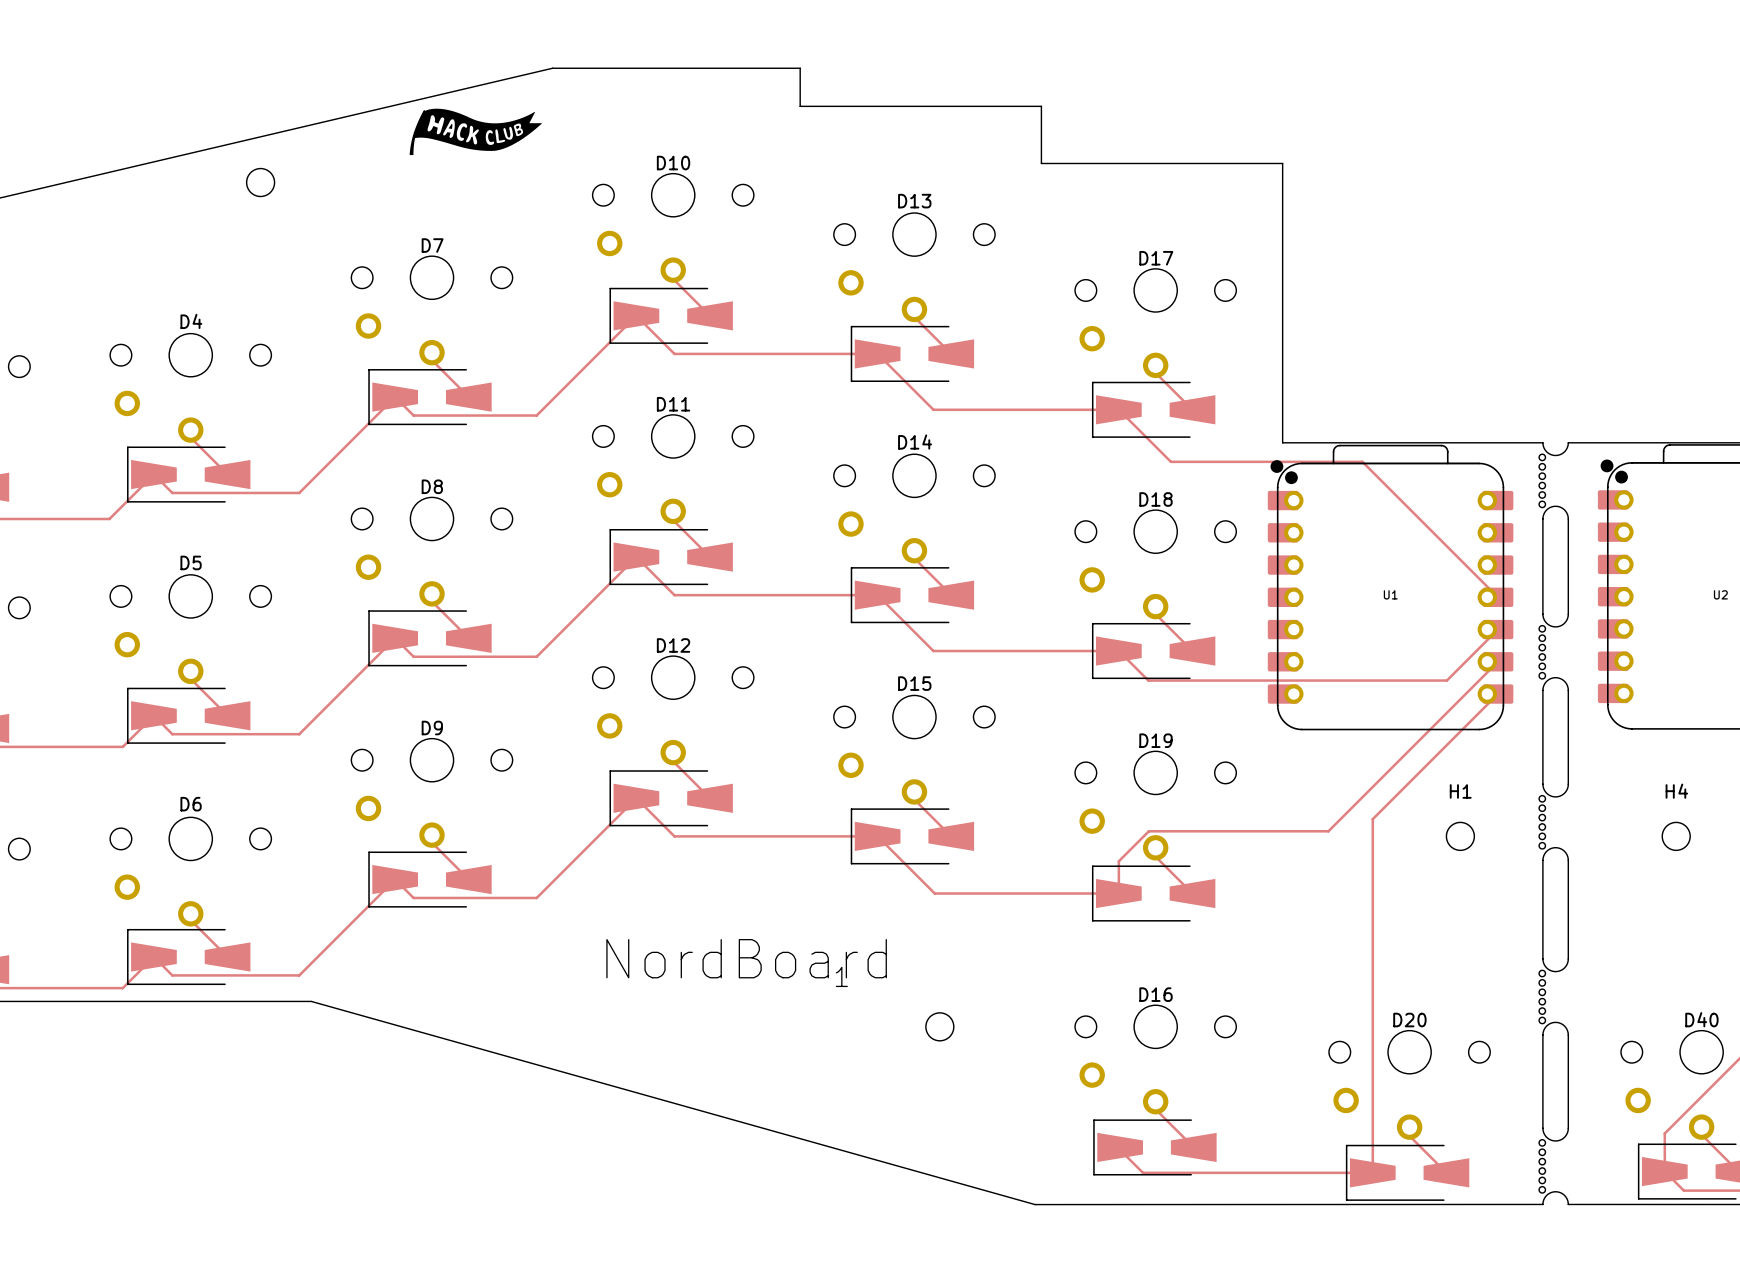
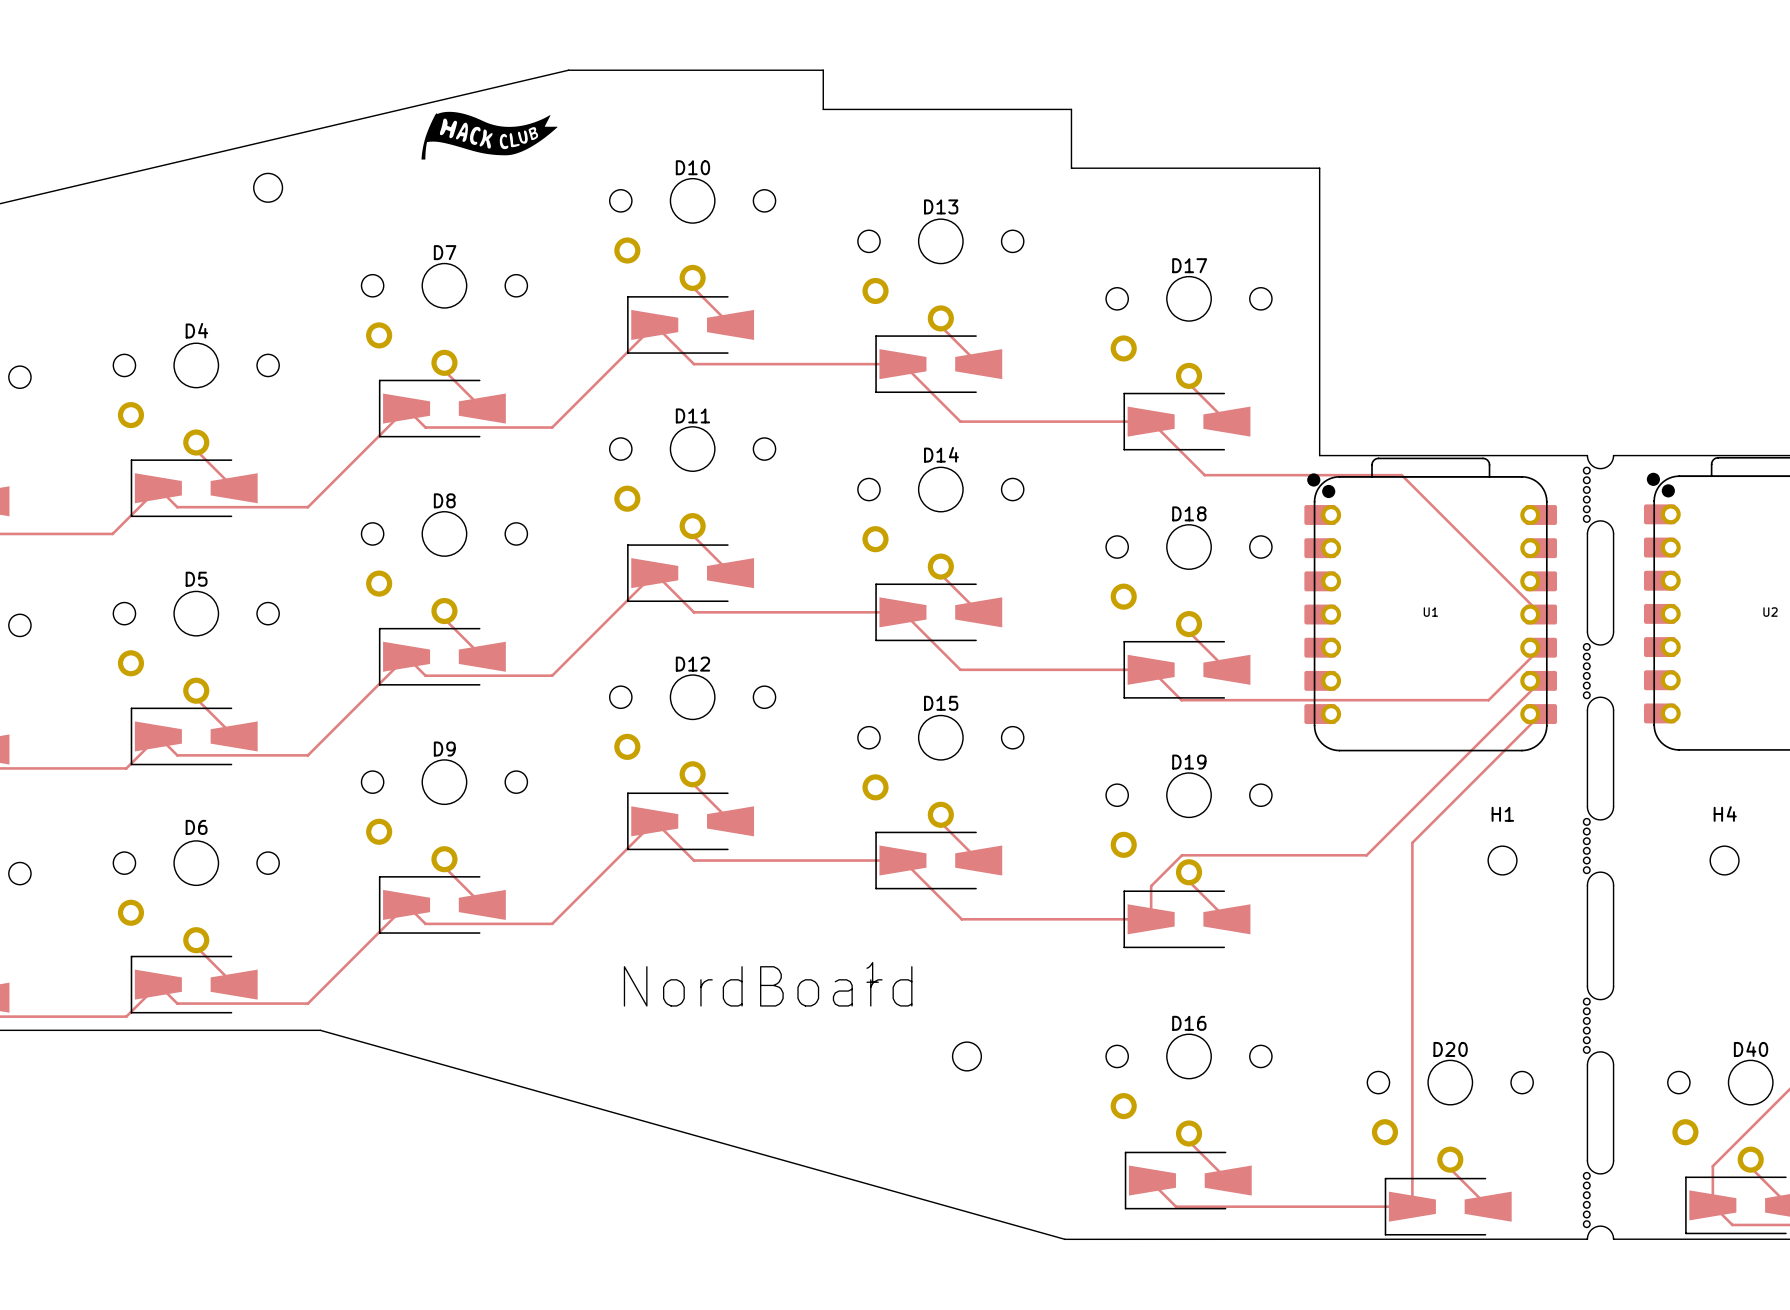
text position: 1 (841, 976) -> 1 (872, 972)

